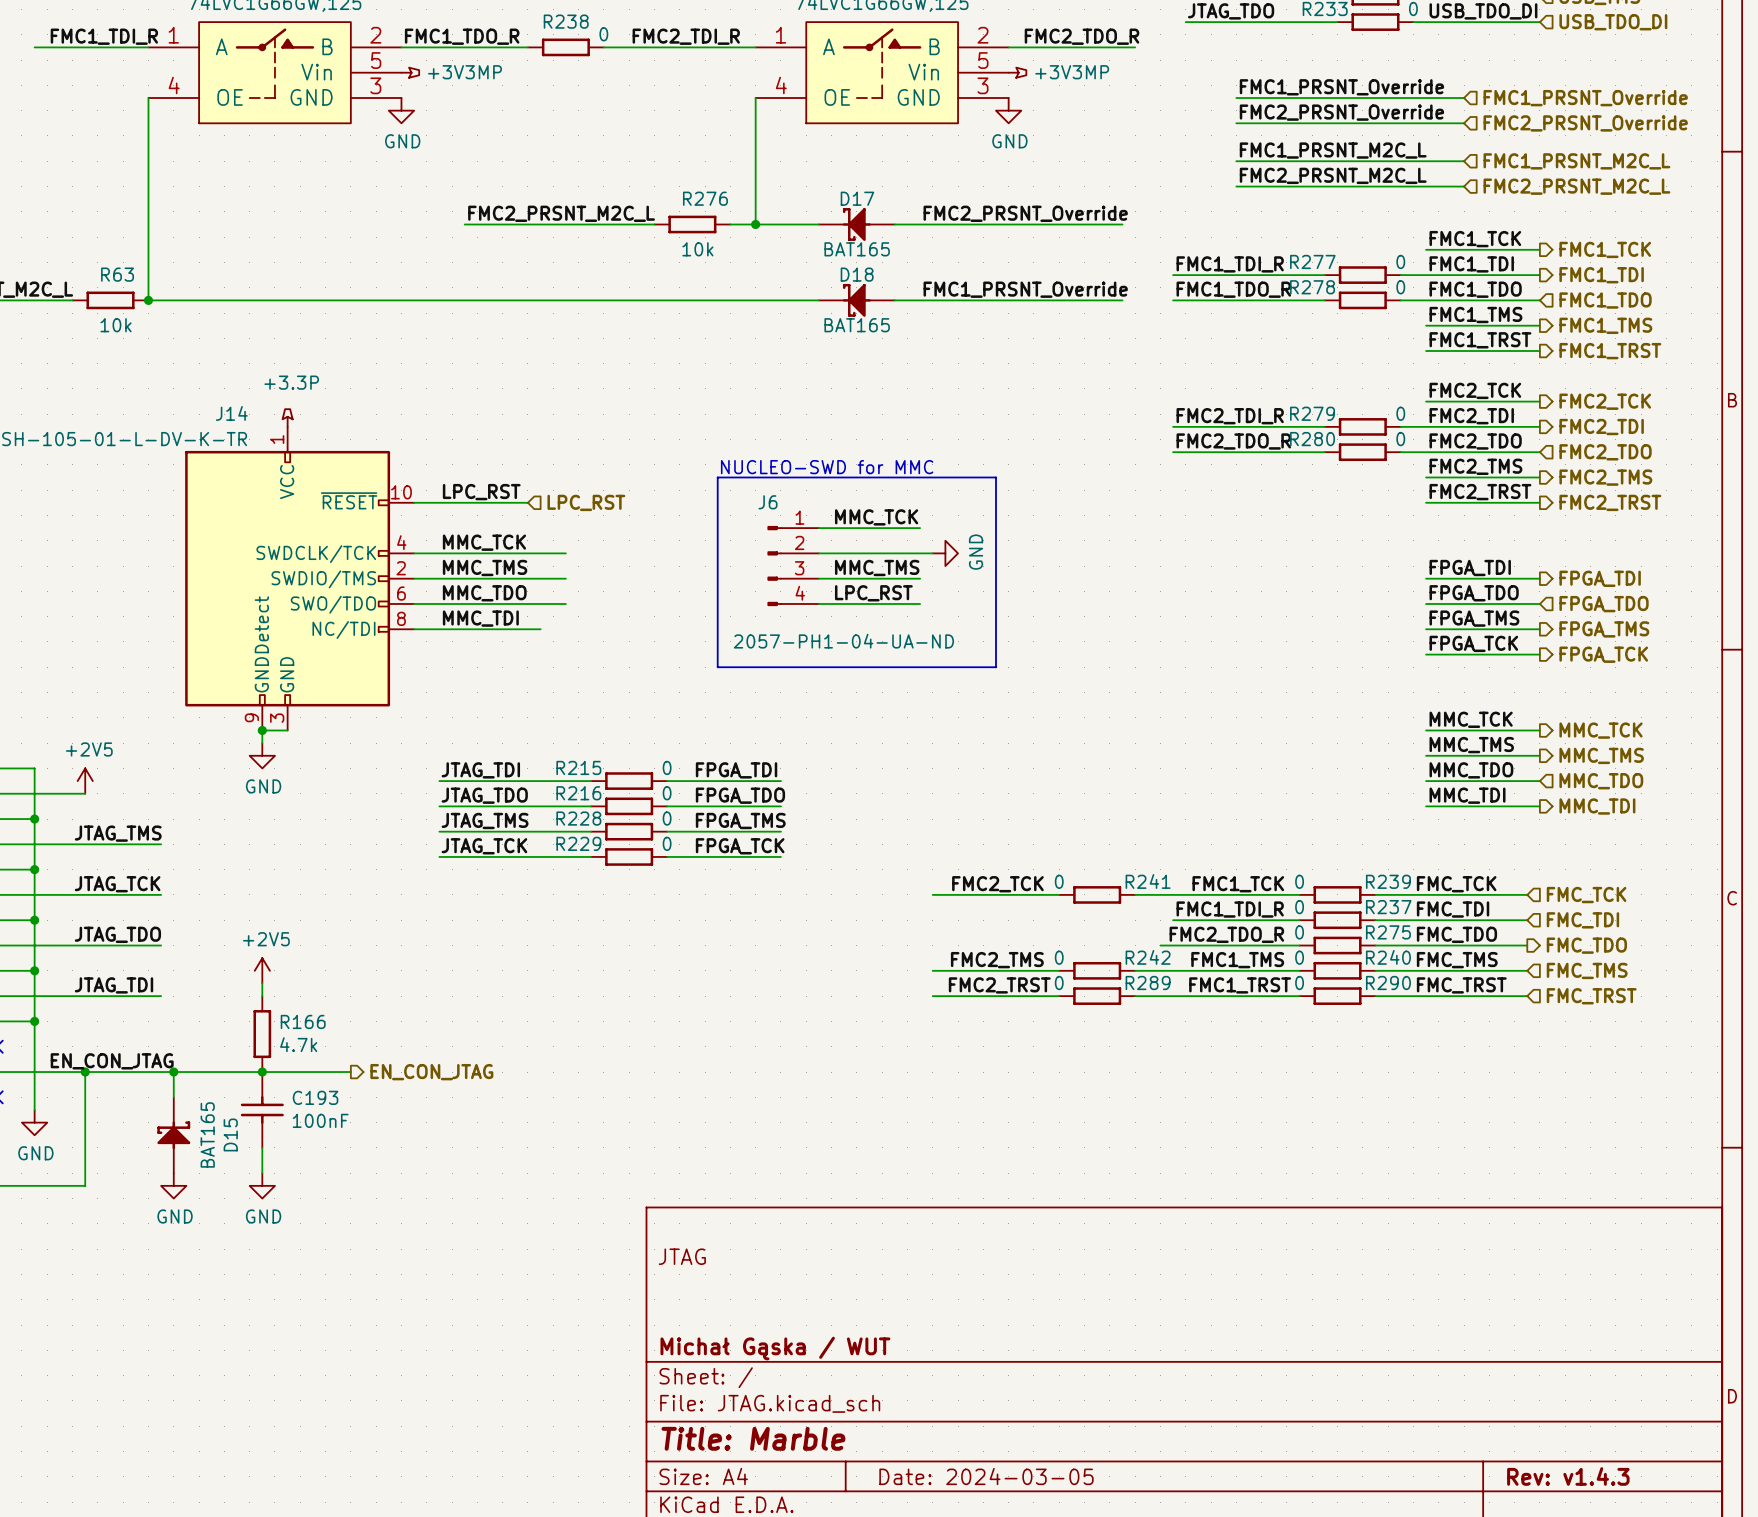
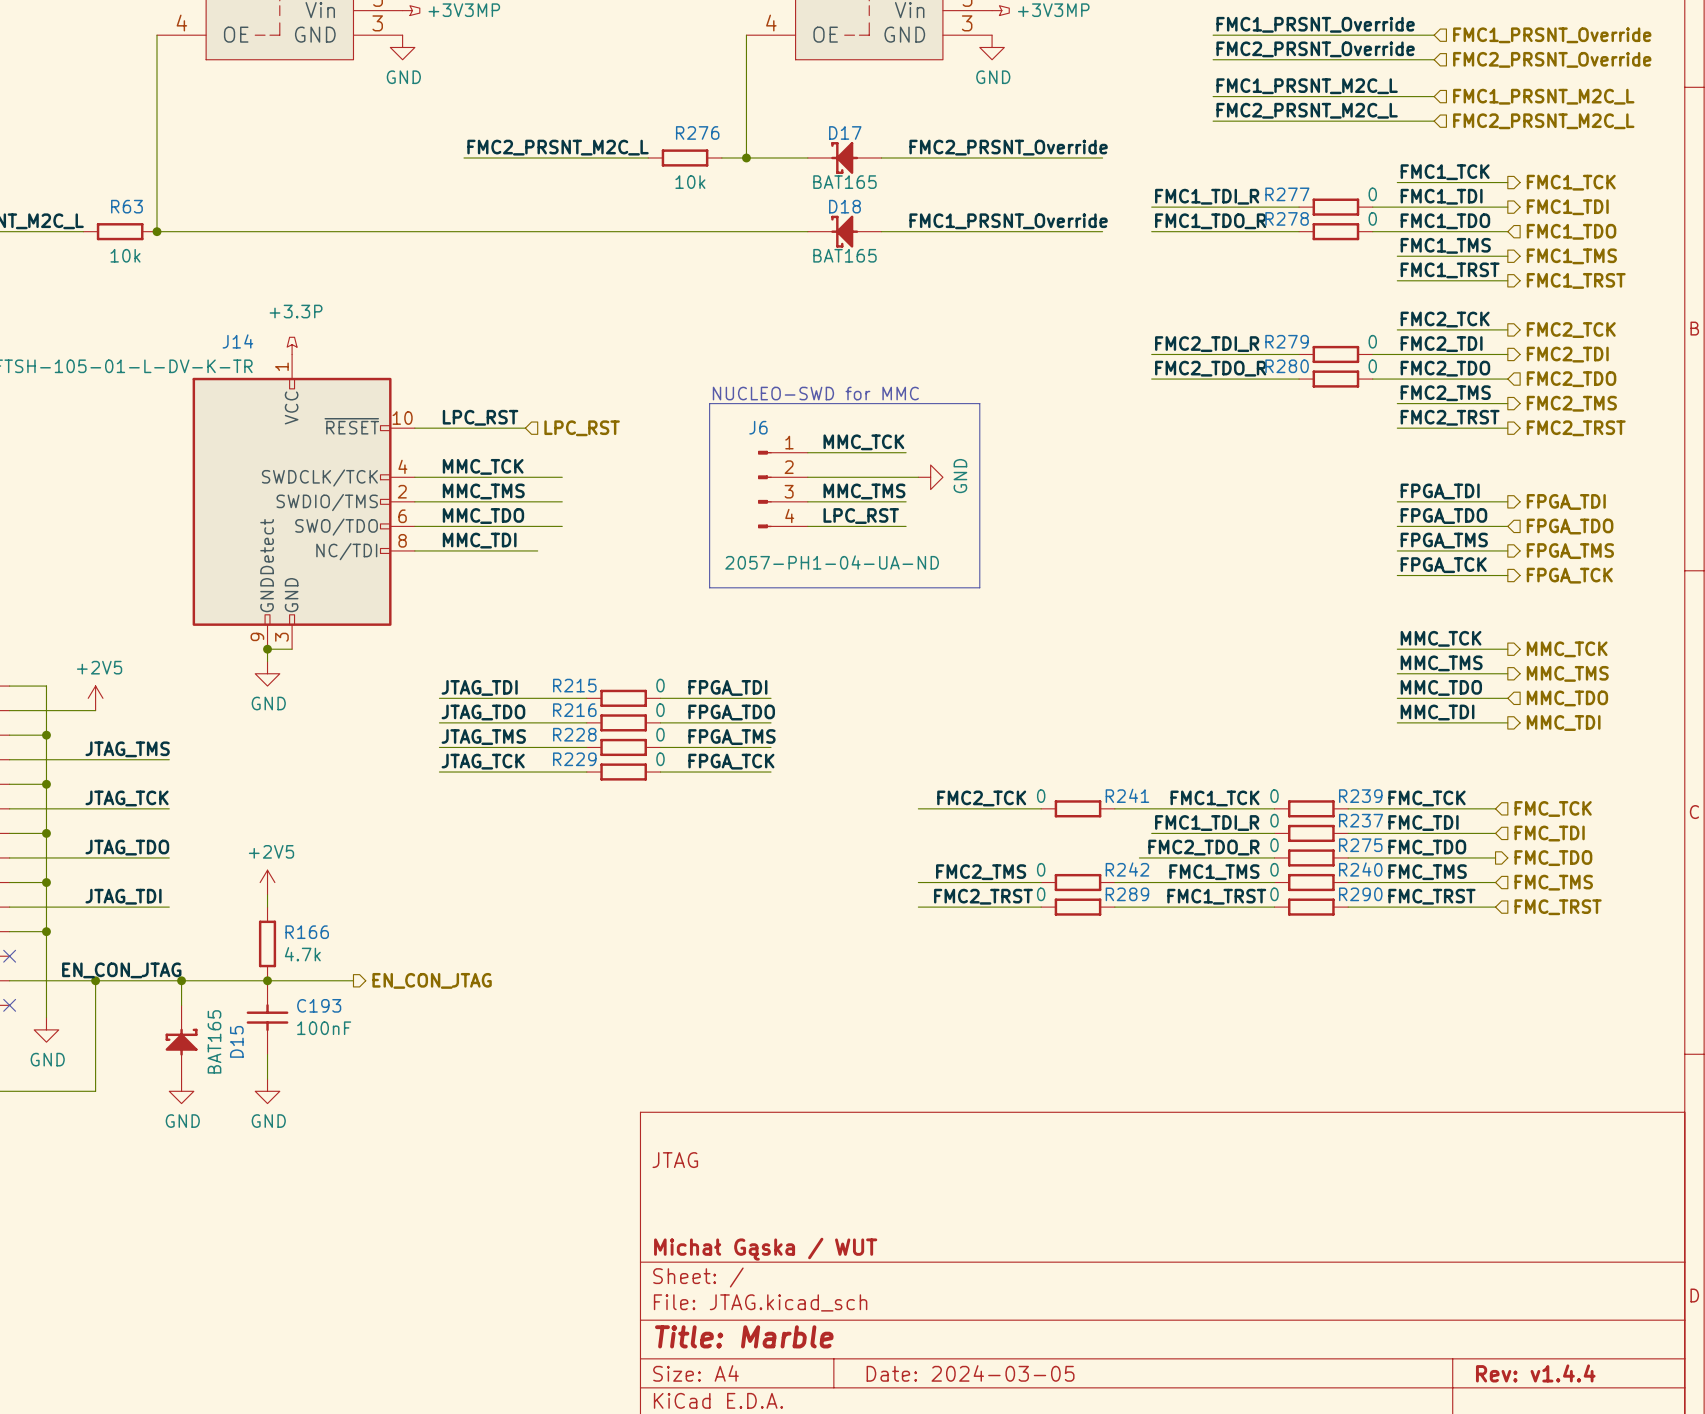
title block: Rev: v1.4.3 (1568, 1476) -> Rev: v1.4.4 (1535, 1373)

